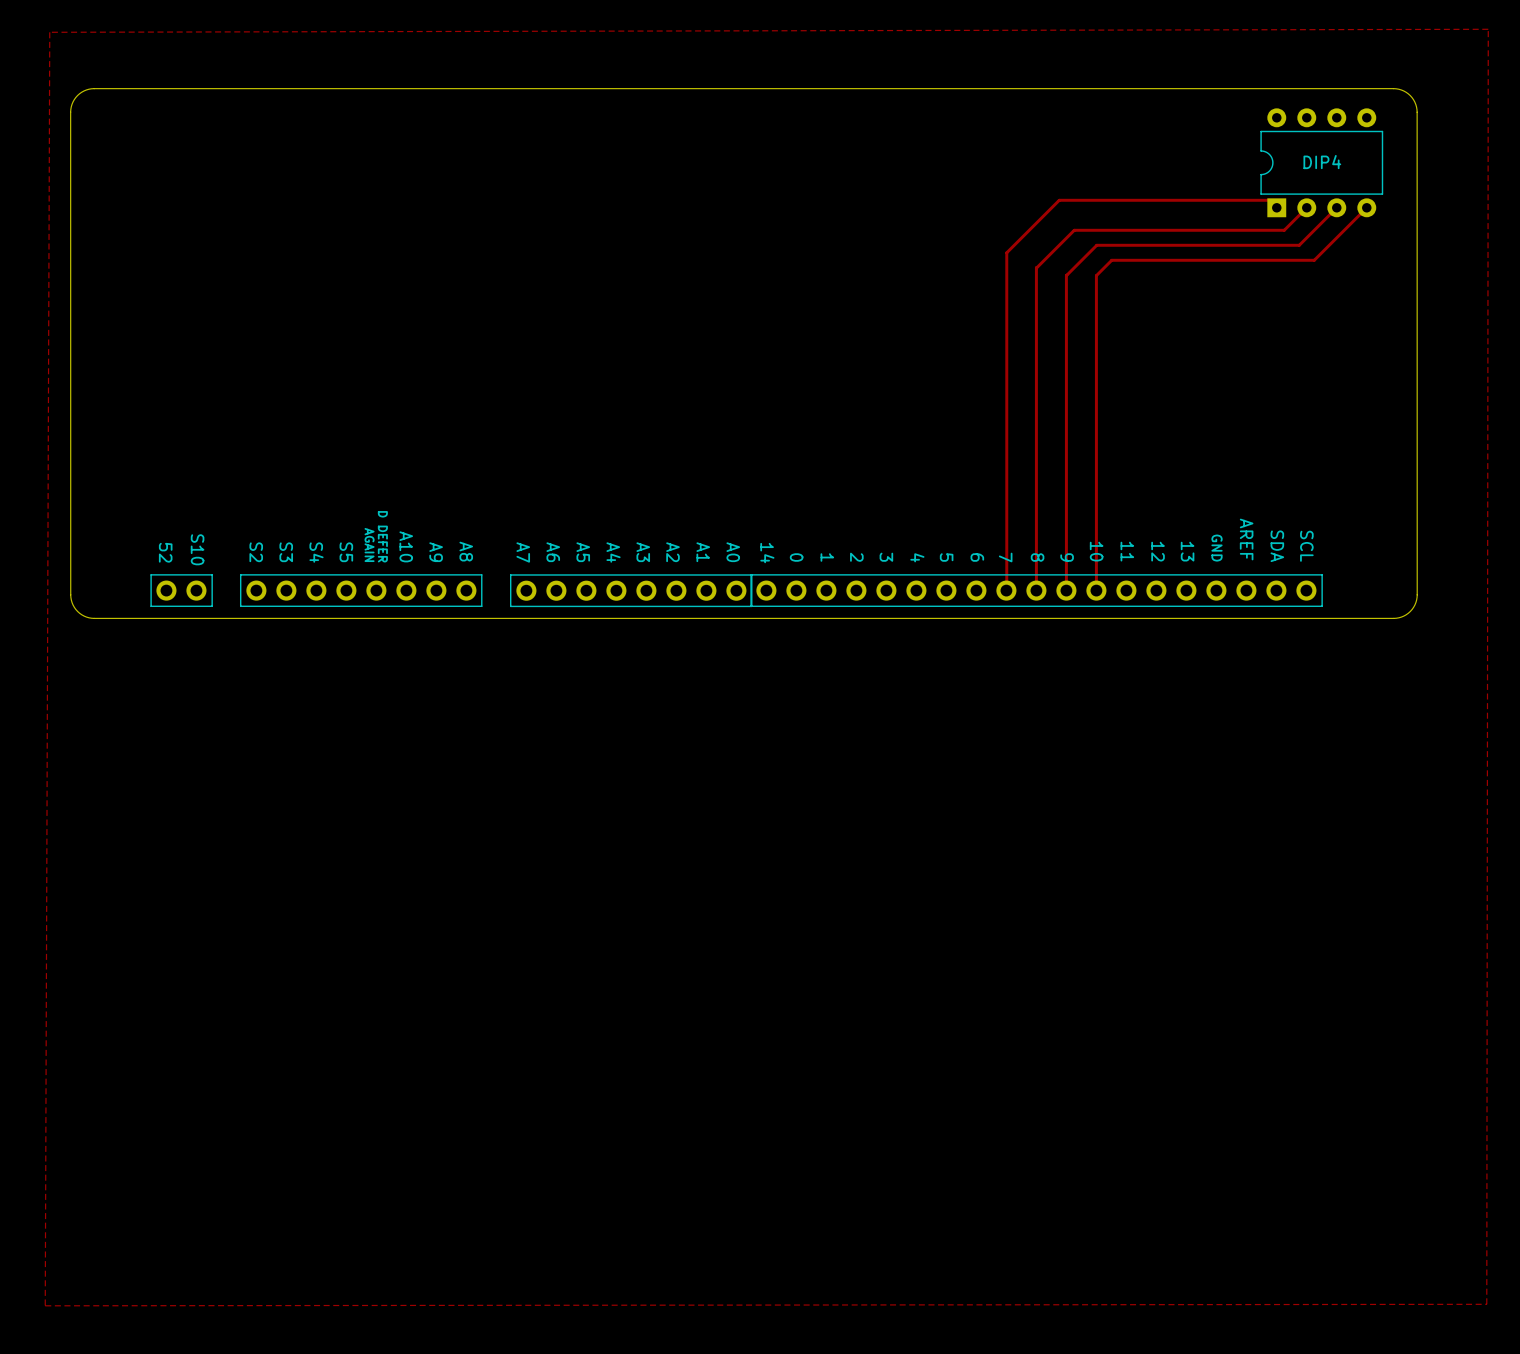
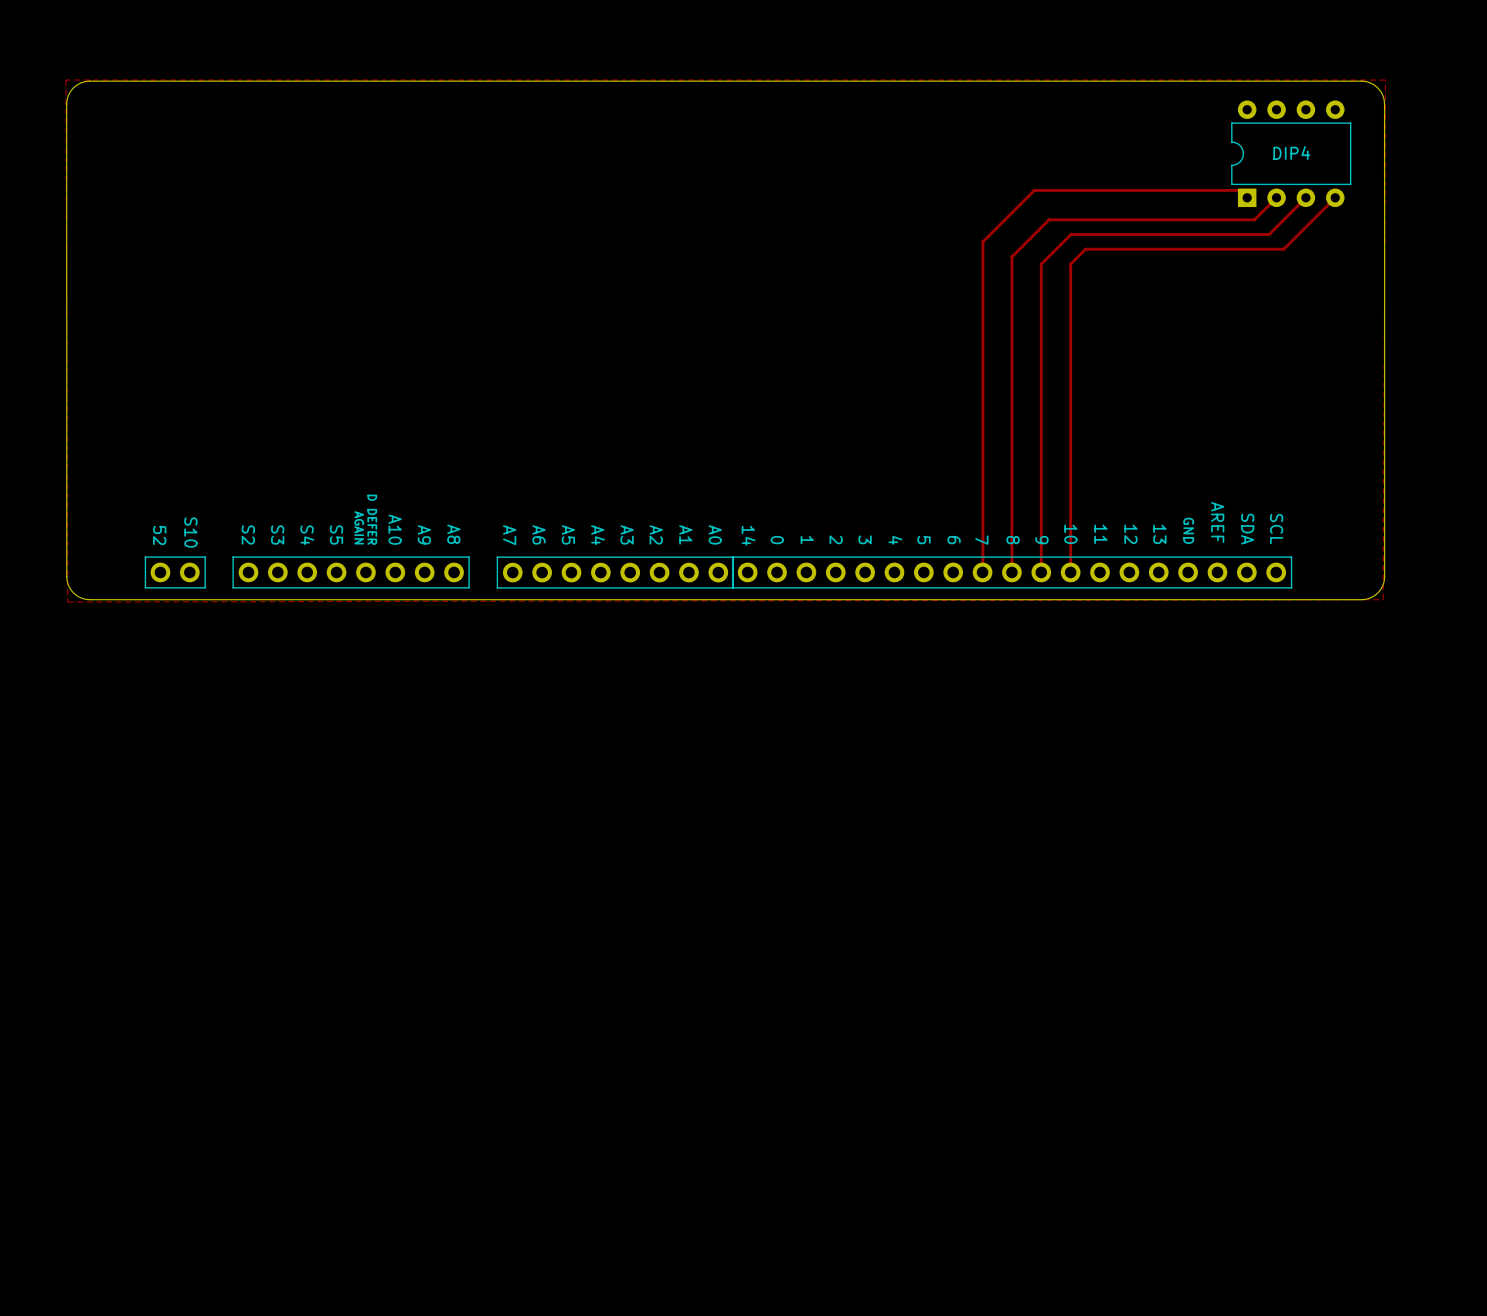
zone outline: (1488, 29) (1486, 1304) (45, 1305) (49, 32) (1488, 29) -> none
zone outline: none -> (65, 80) (67, 602) (1383, 599) (1385, 80) (65, 80)

